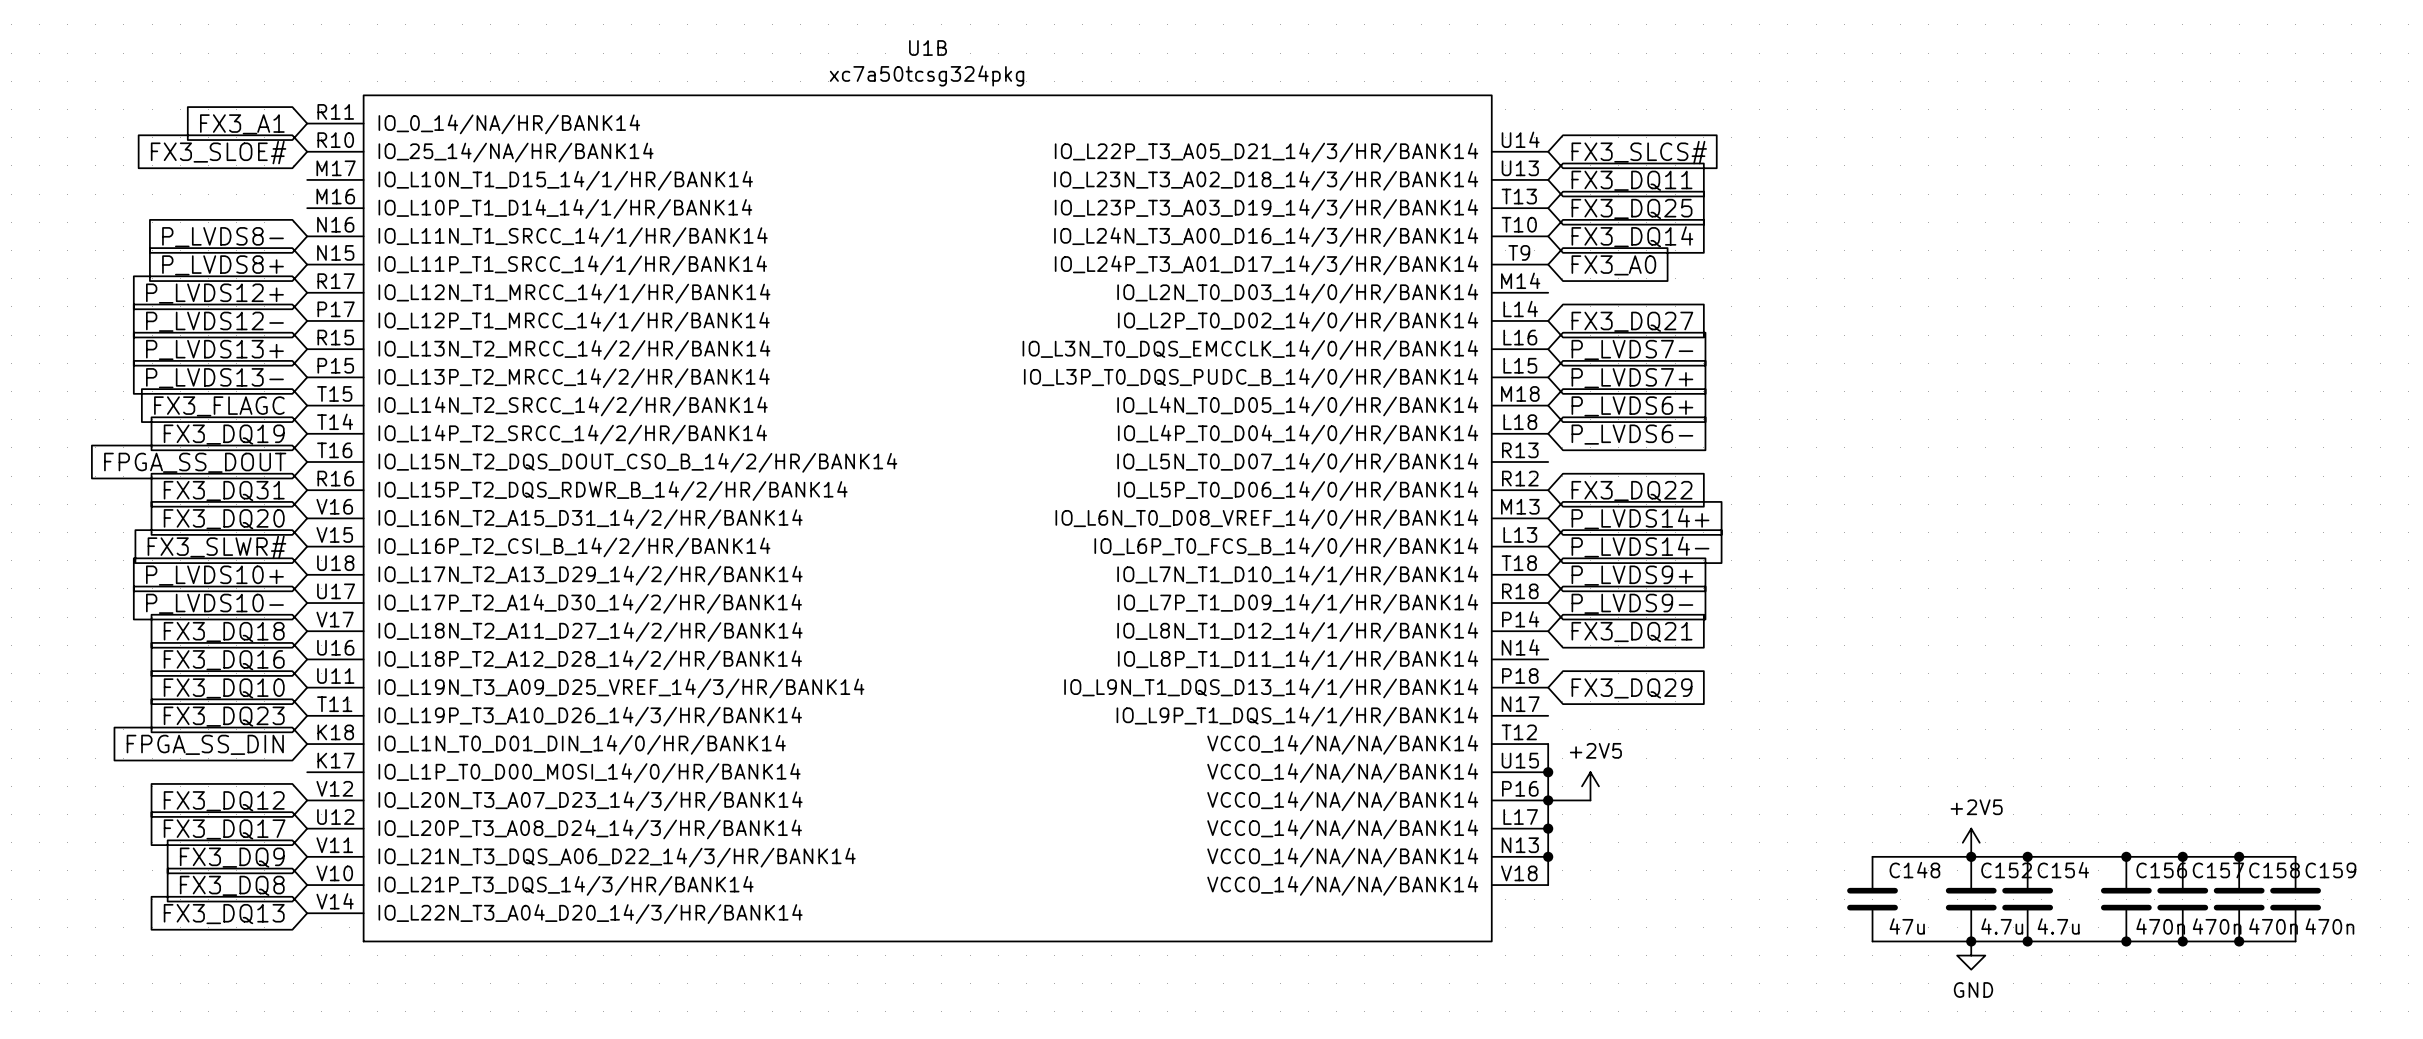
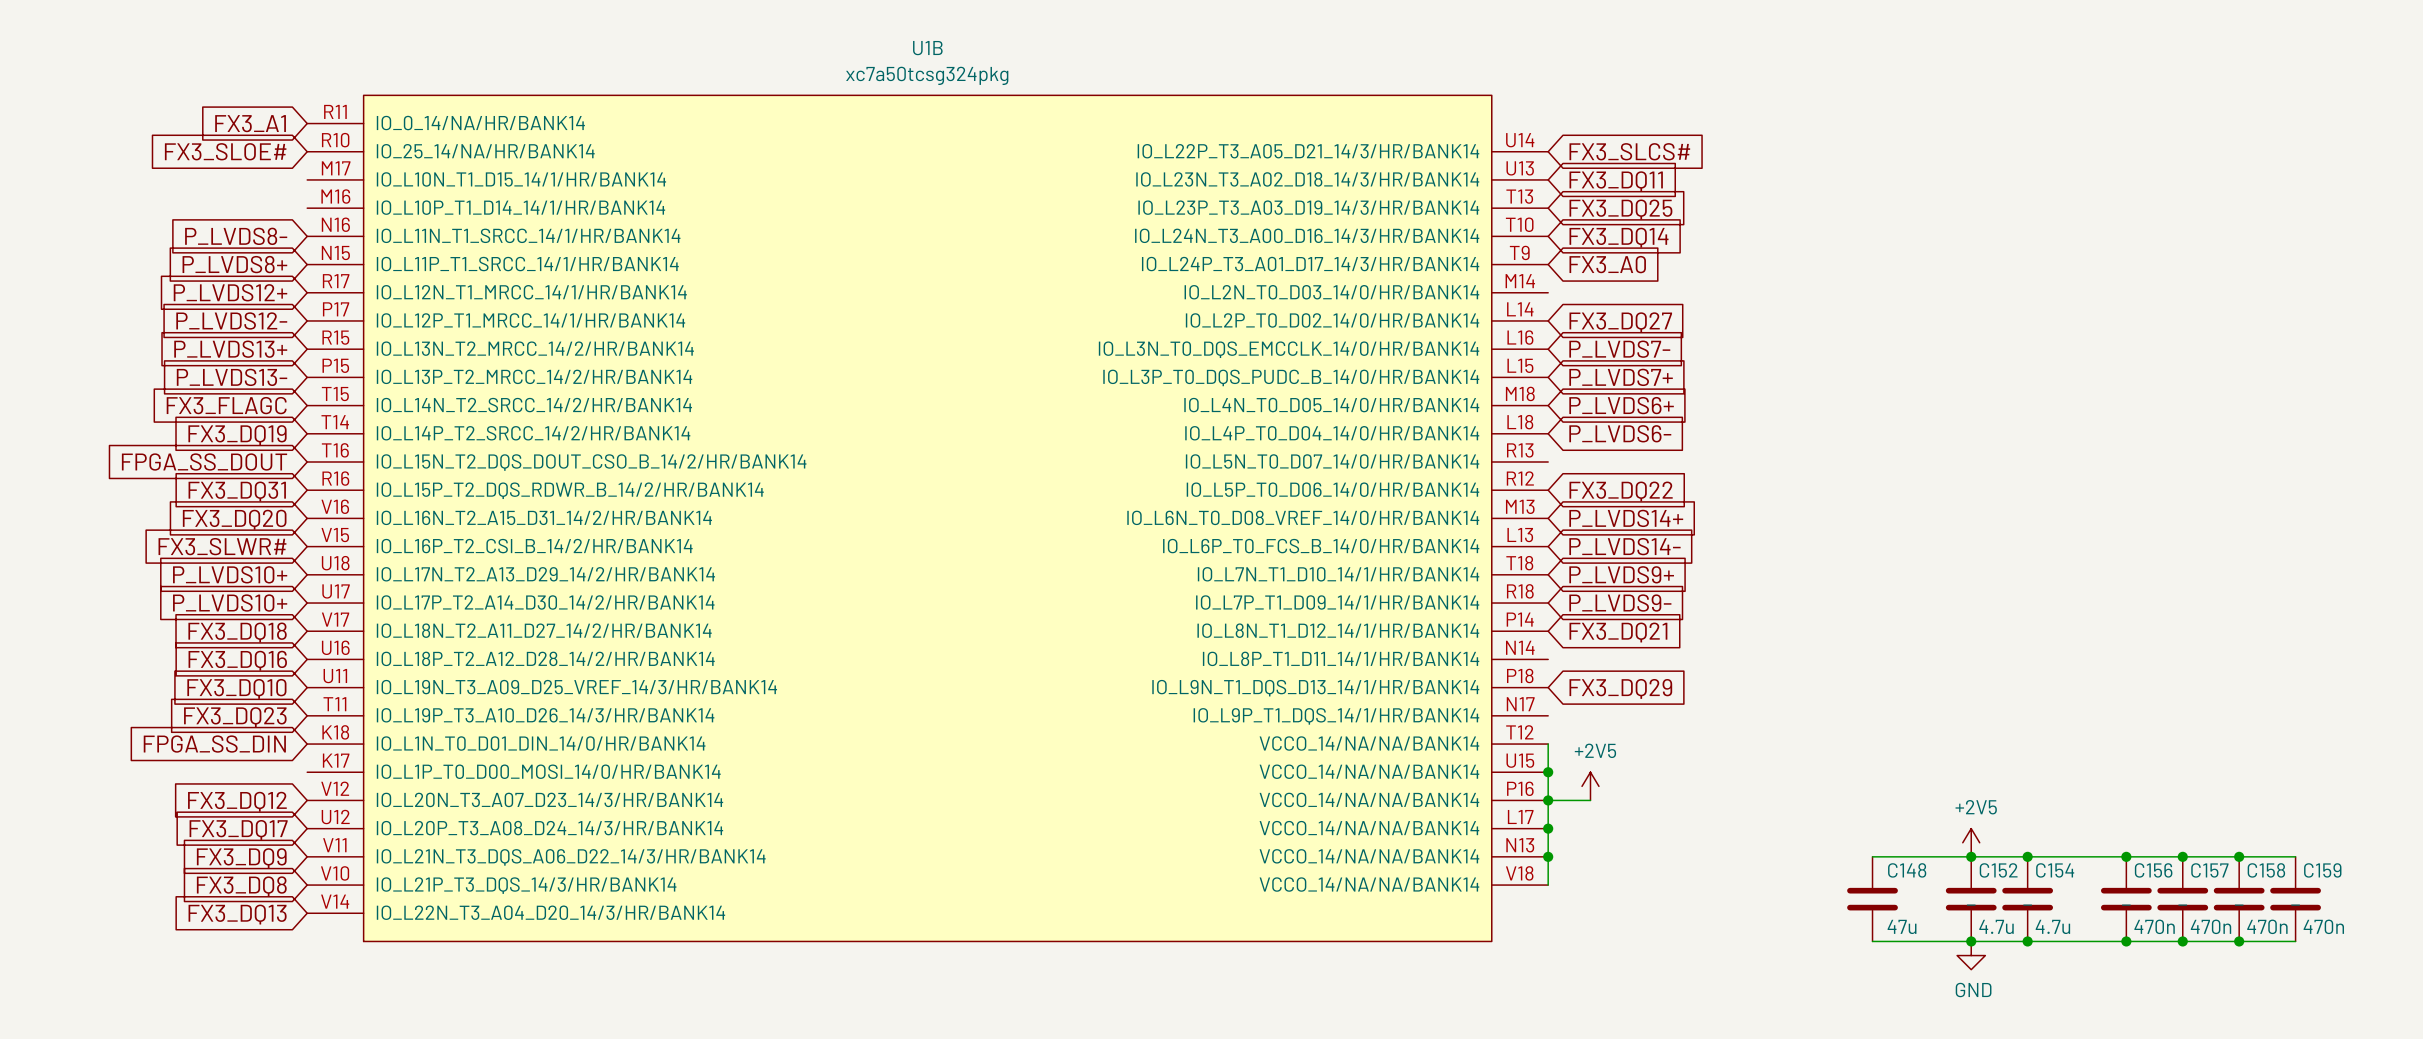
global label: P_LVDS10- (214, 603) -> P_LVDS10+ (230, 603)

